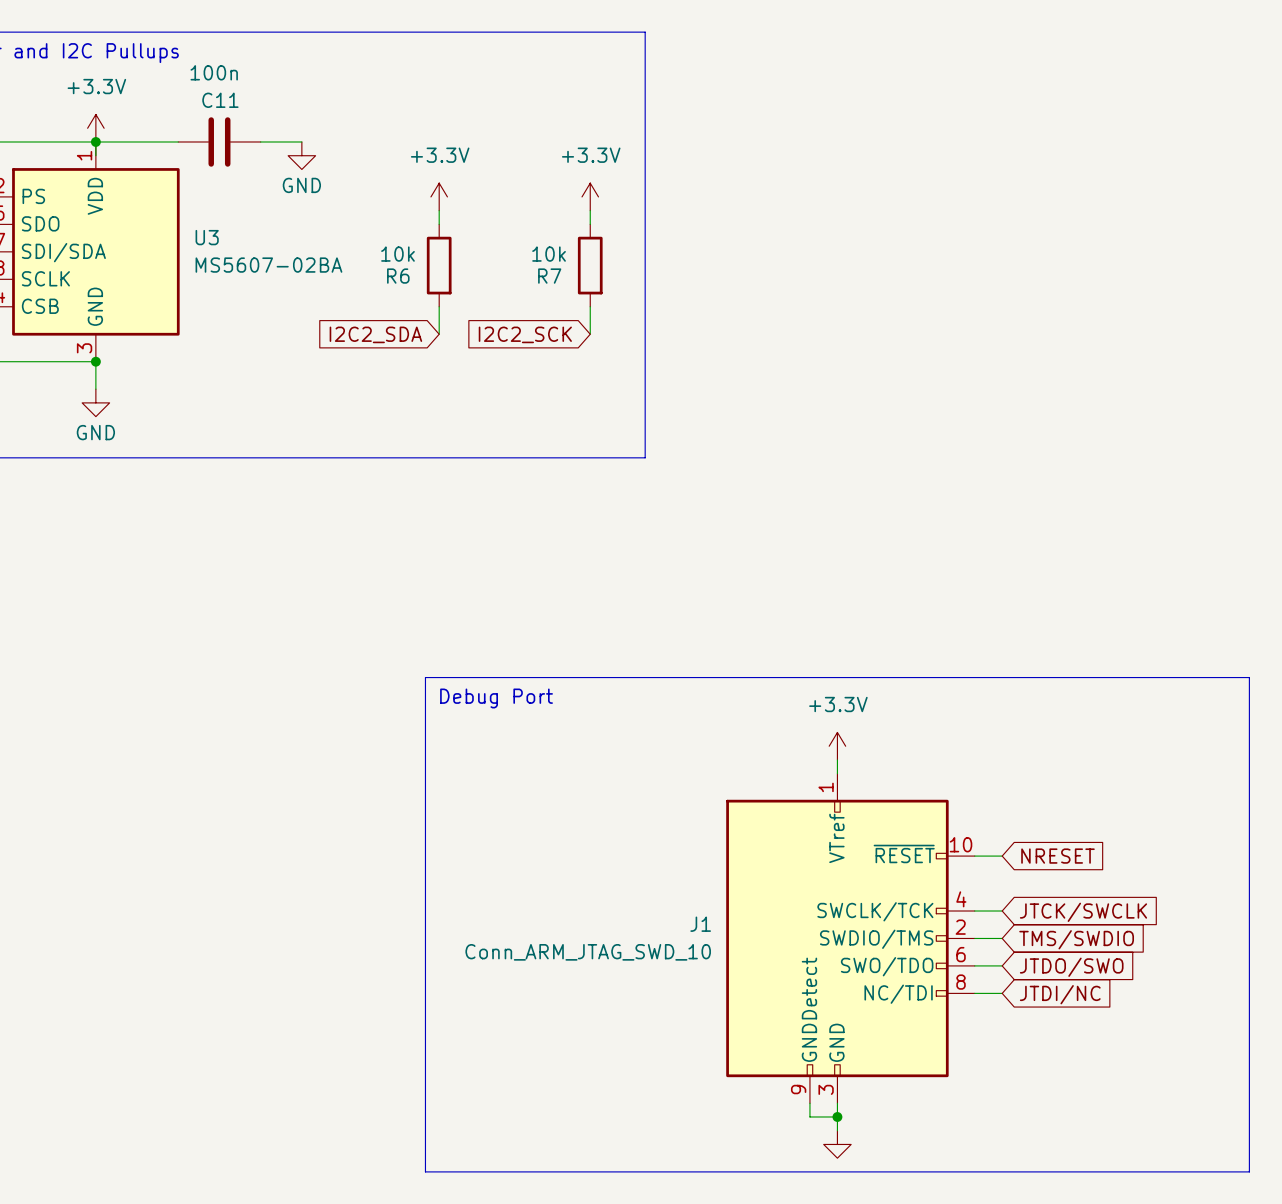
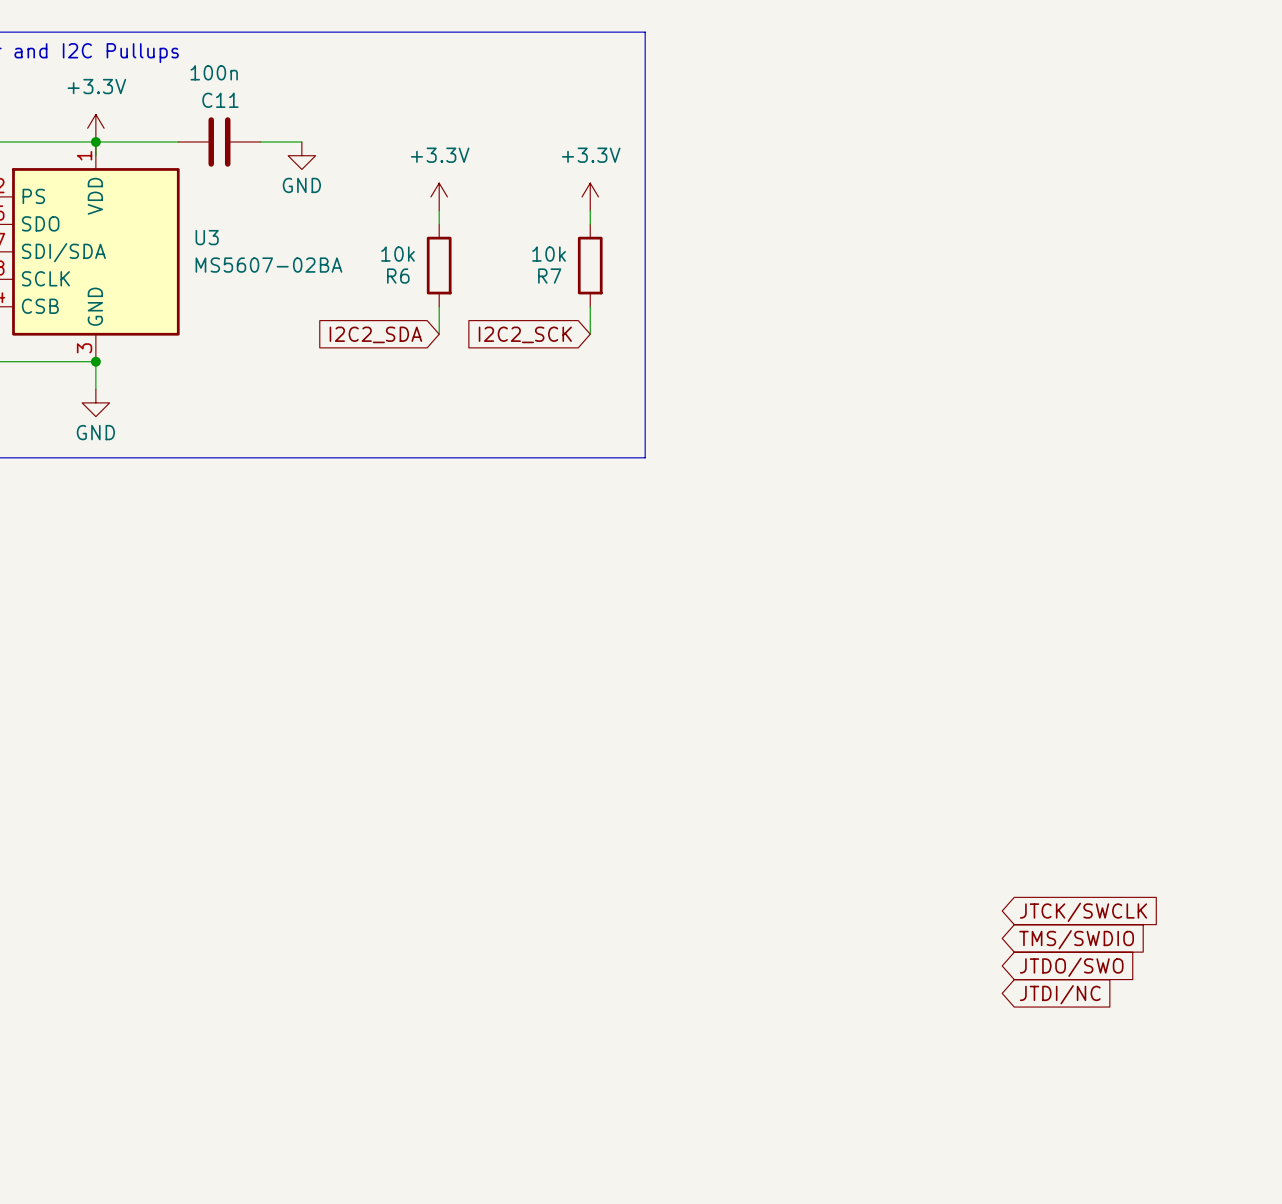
line: (425, 677) (1249, 677) (1249, 1171) (425, 1171) (425, 677) -> none
text: Debug Port (496, 698) -> none
power symbol: +3.3V (837, 746) -> none
wire: (837, 759) (837, 773) -> none
wire: (974, 856) (1002, 856) -> none
global label: NRESET (1057, 856) -> none
wire: (974, 911) (1002, 911) -> none
J1: Conn_ARM_JTAG_SWD_10 (850, 938) -> none
wire: (974, 938) (1002, 938) -> none
wire: (974, 965) (1002, 965) -> none
wire: (974, 993) (1002, 993) -> none
wire: (809, 1103) (809, 1116) (837, 1116) -> none
wire: (837, 1103) (837, 1130) -> none
junction: (837, 1116) -> none
power symbol: (837, 1144) -> none

